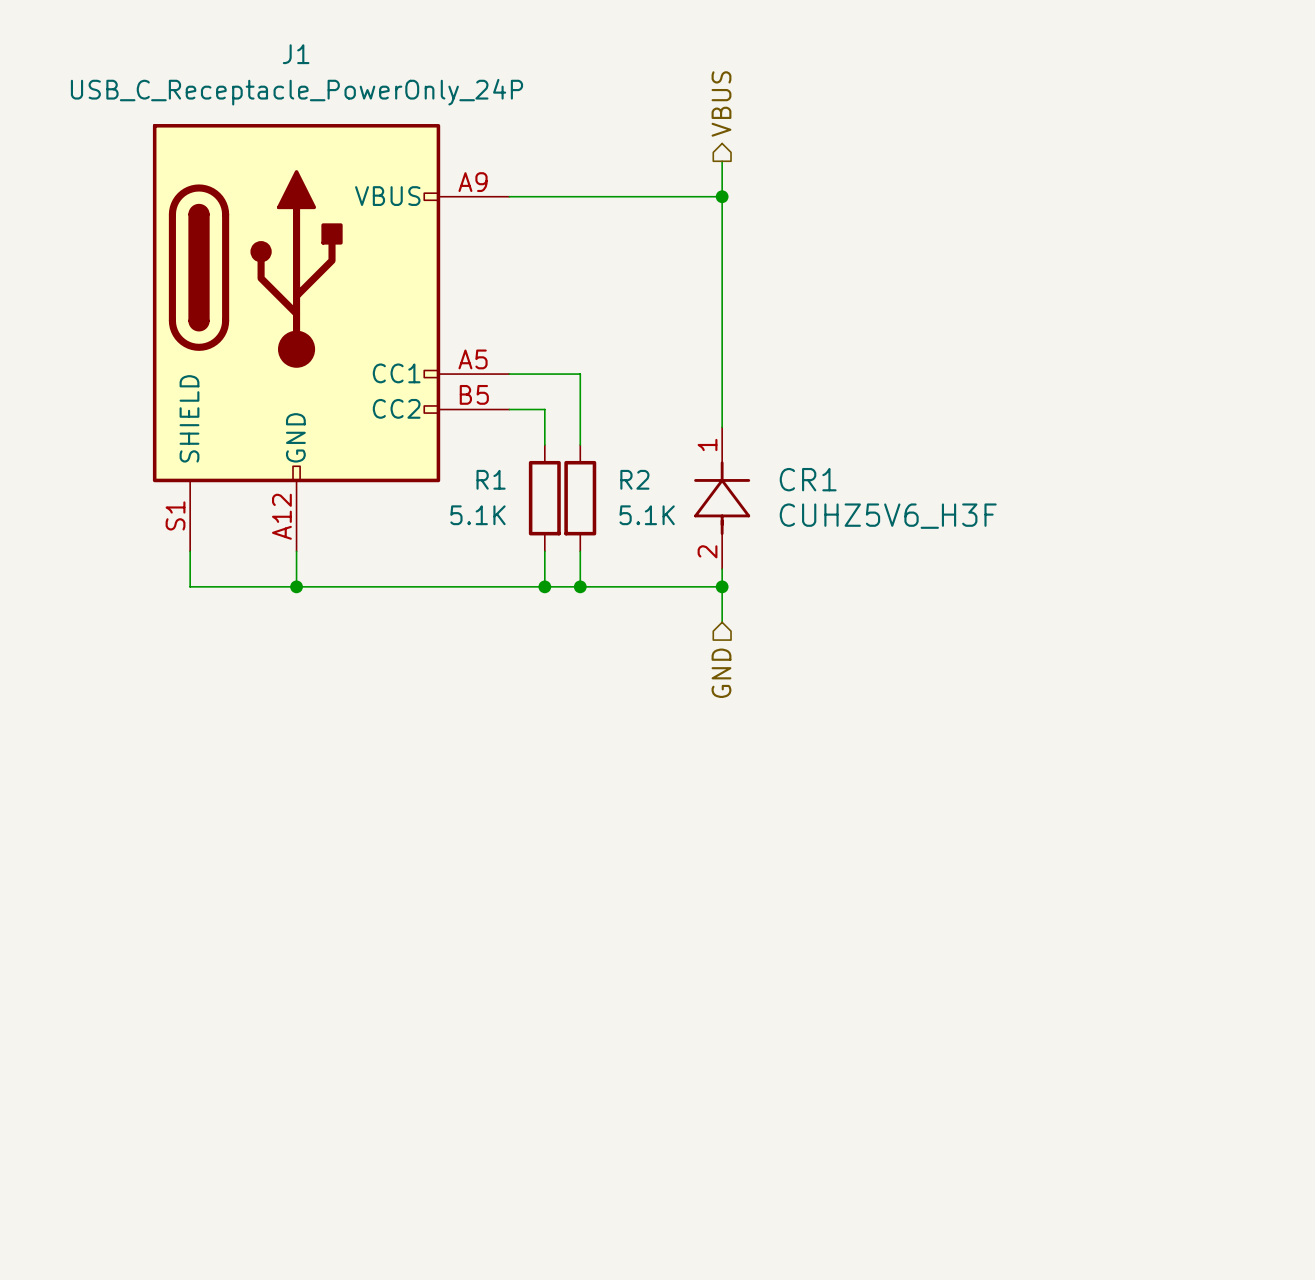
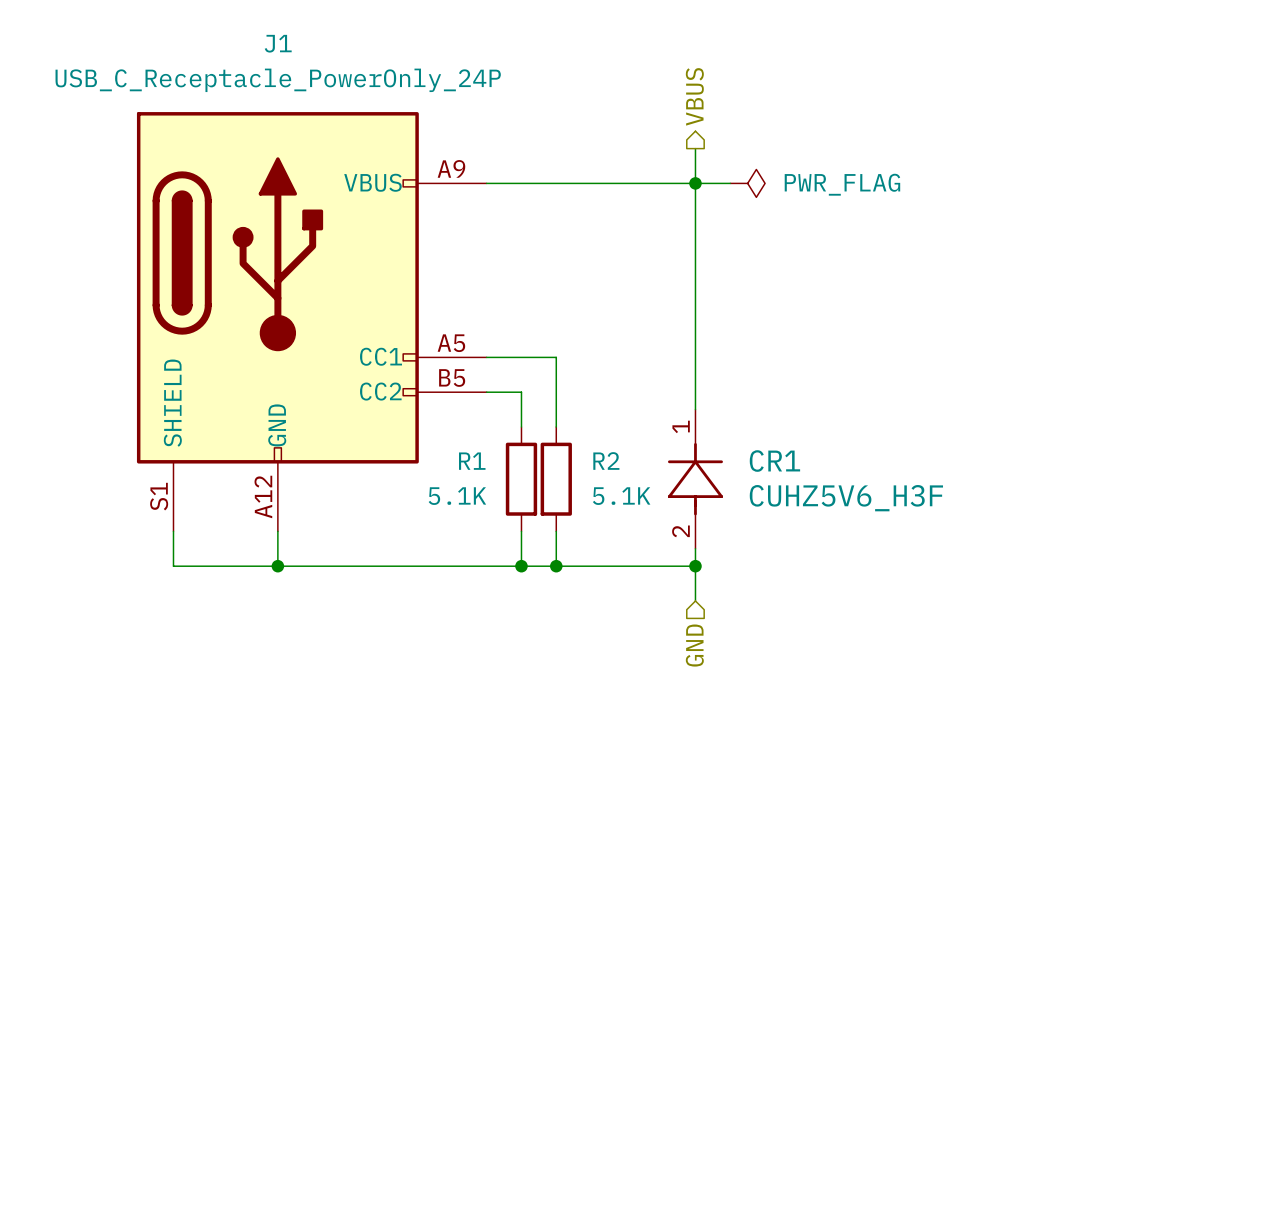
wire: none -> (695, 183) (730, 183)
power symbol: none -> PWR_FLAG (747, 183)

